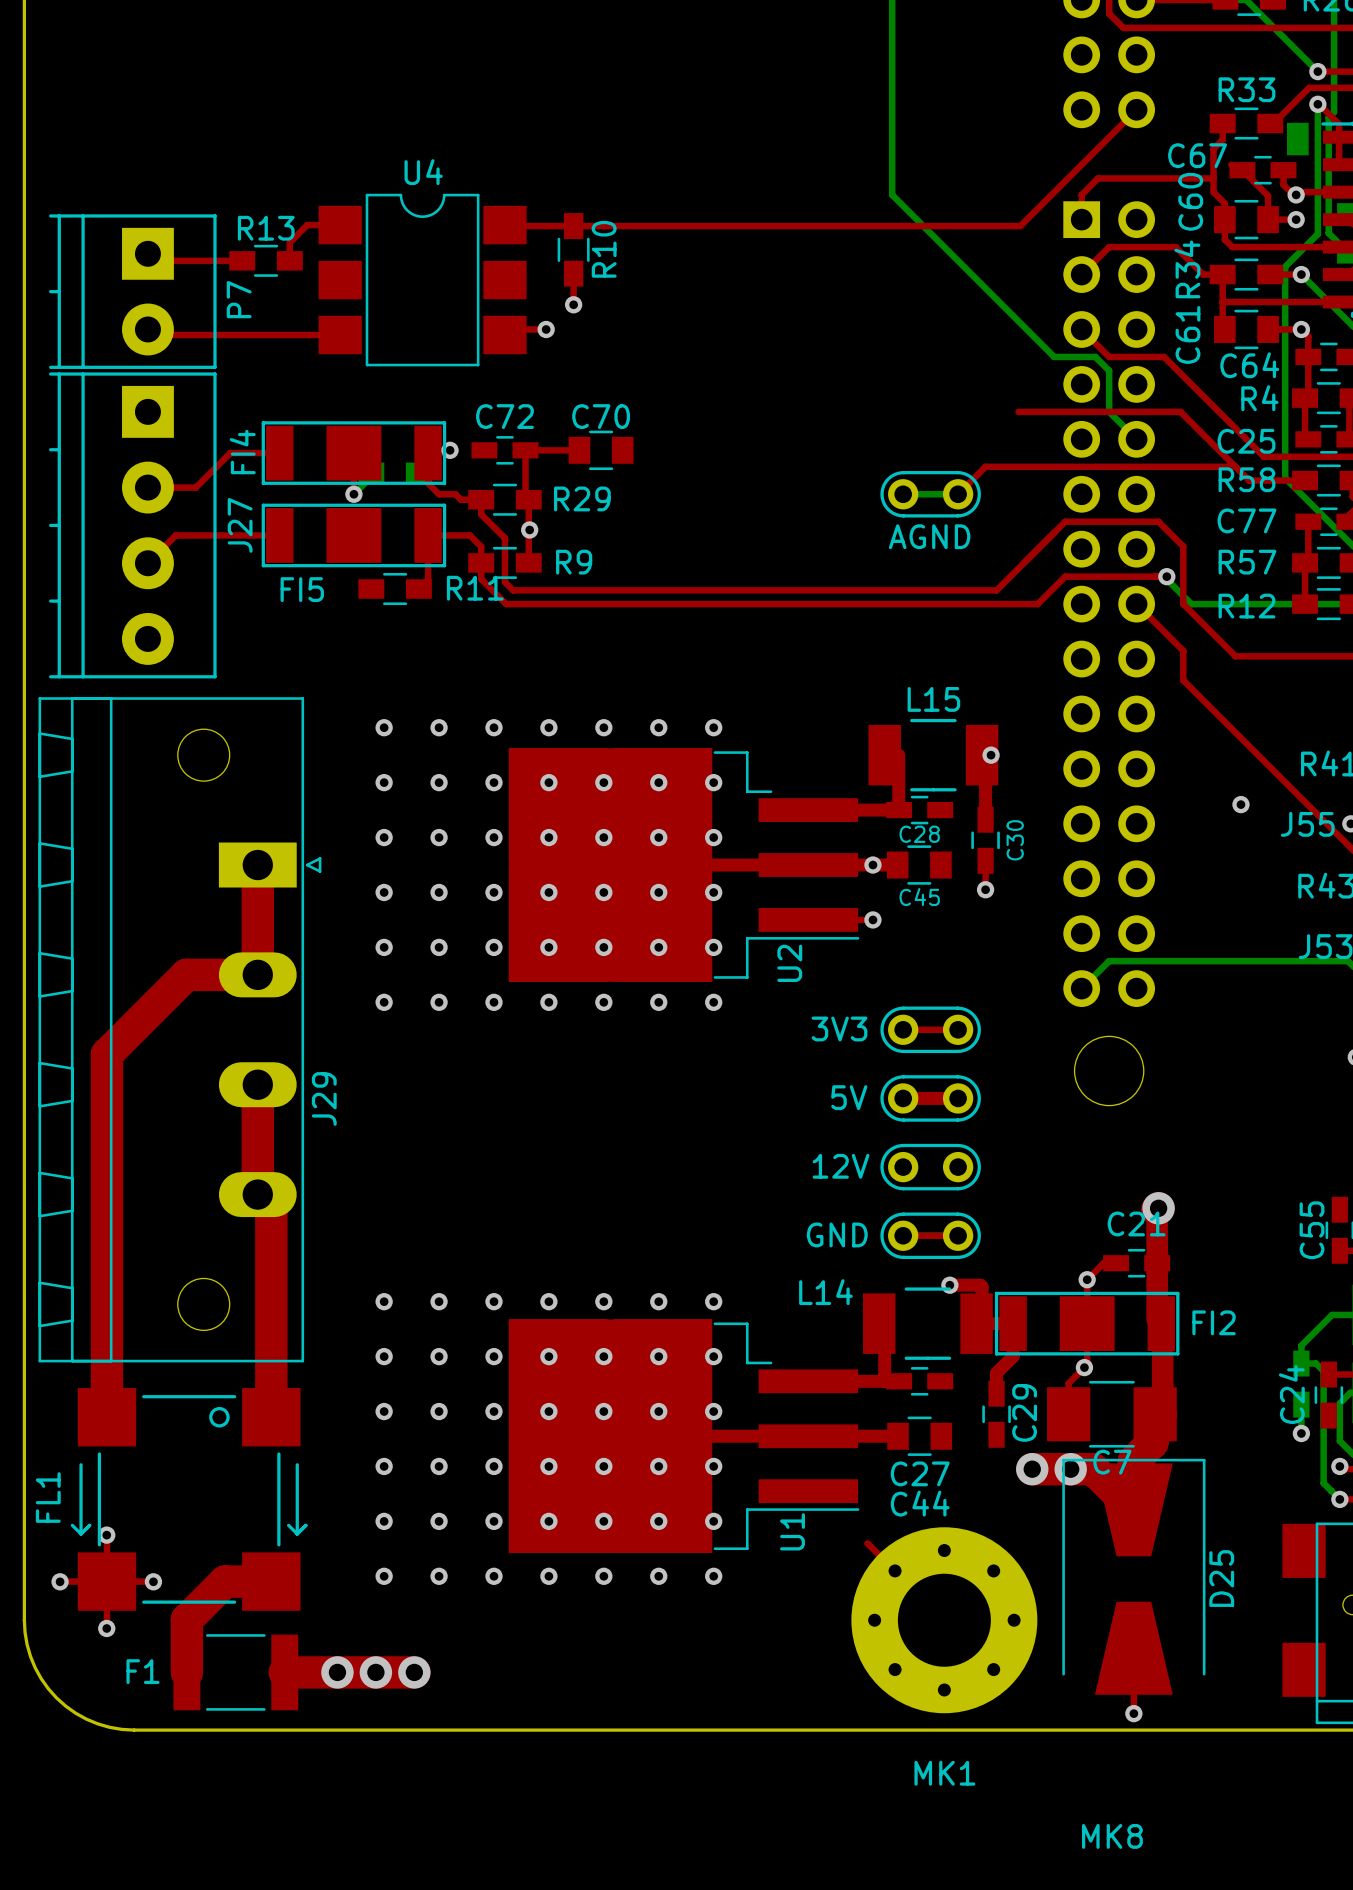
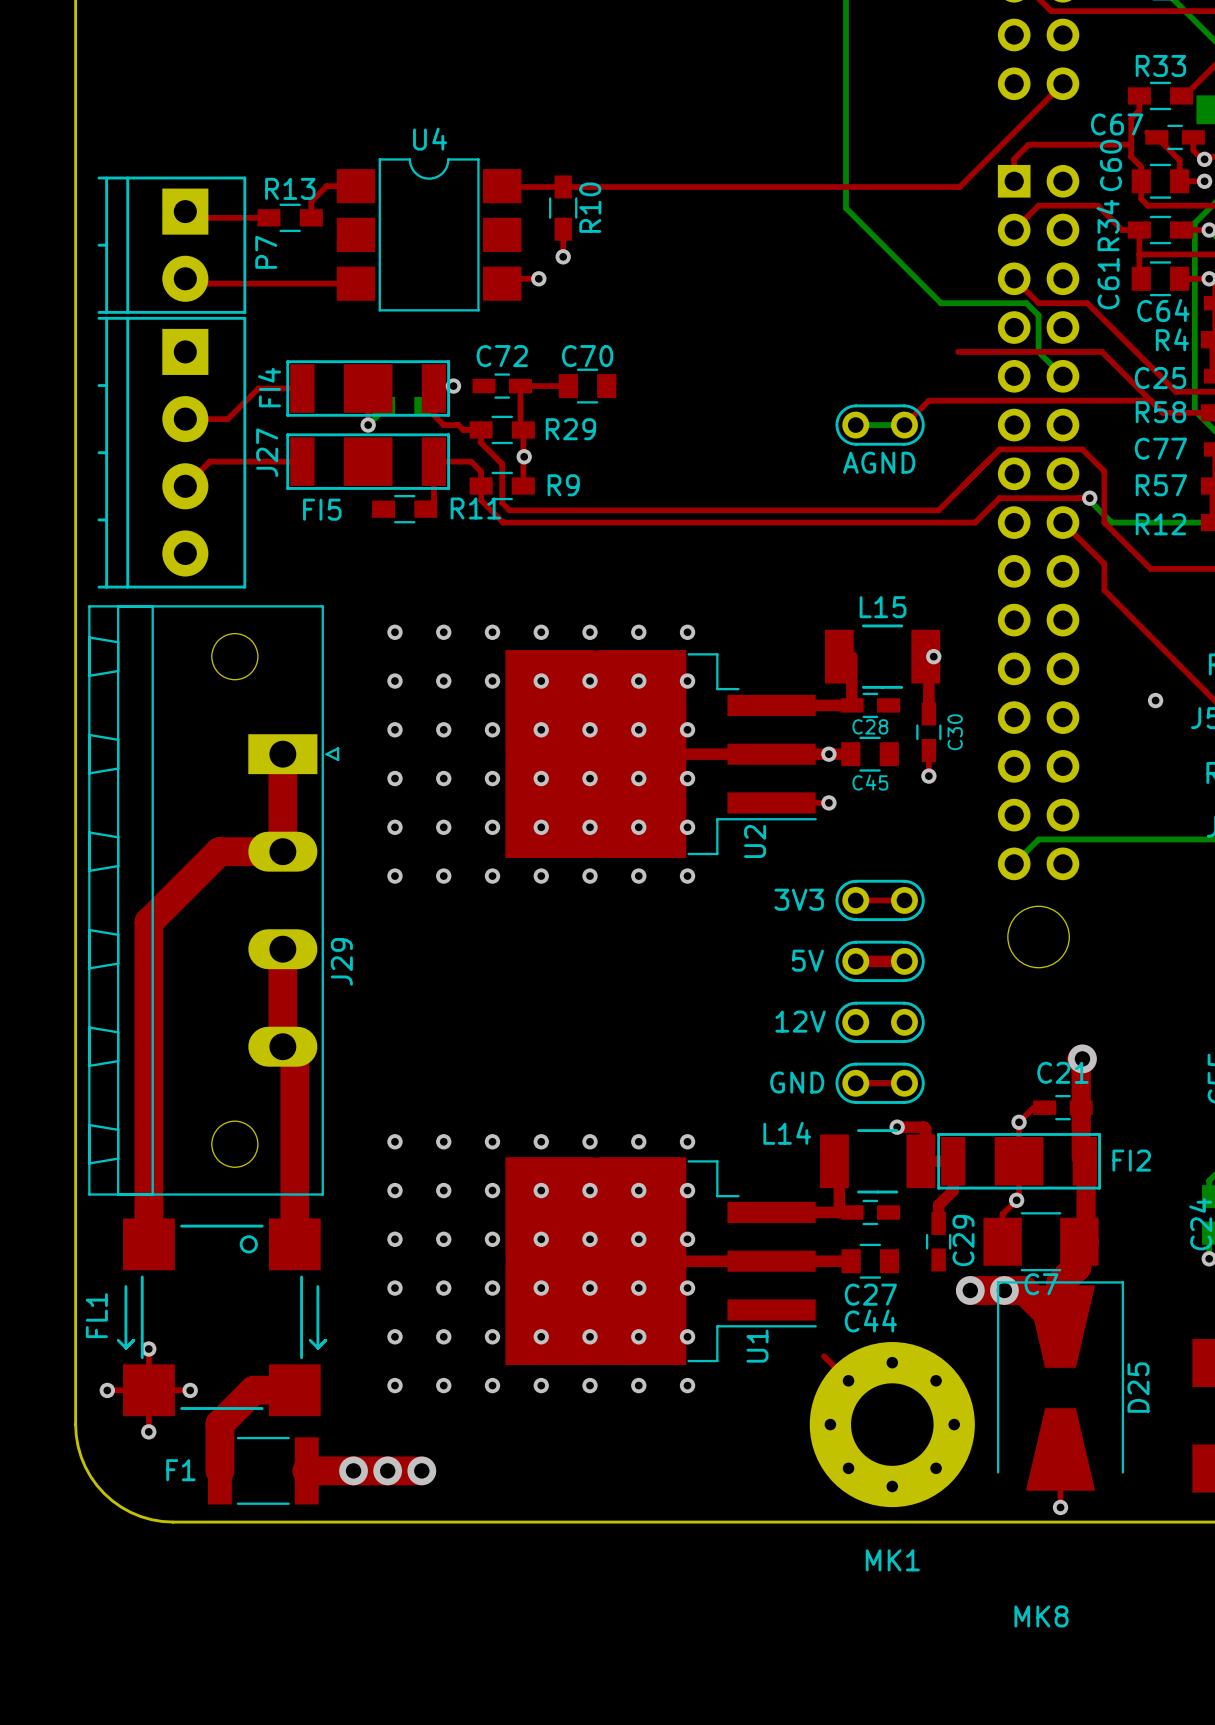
bottom track: (892, 194) (1054, 356) -> (845, 159) (845, 208) (941, 303) (989, 303)

